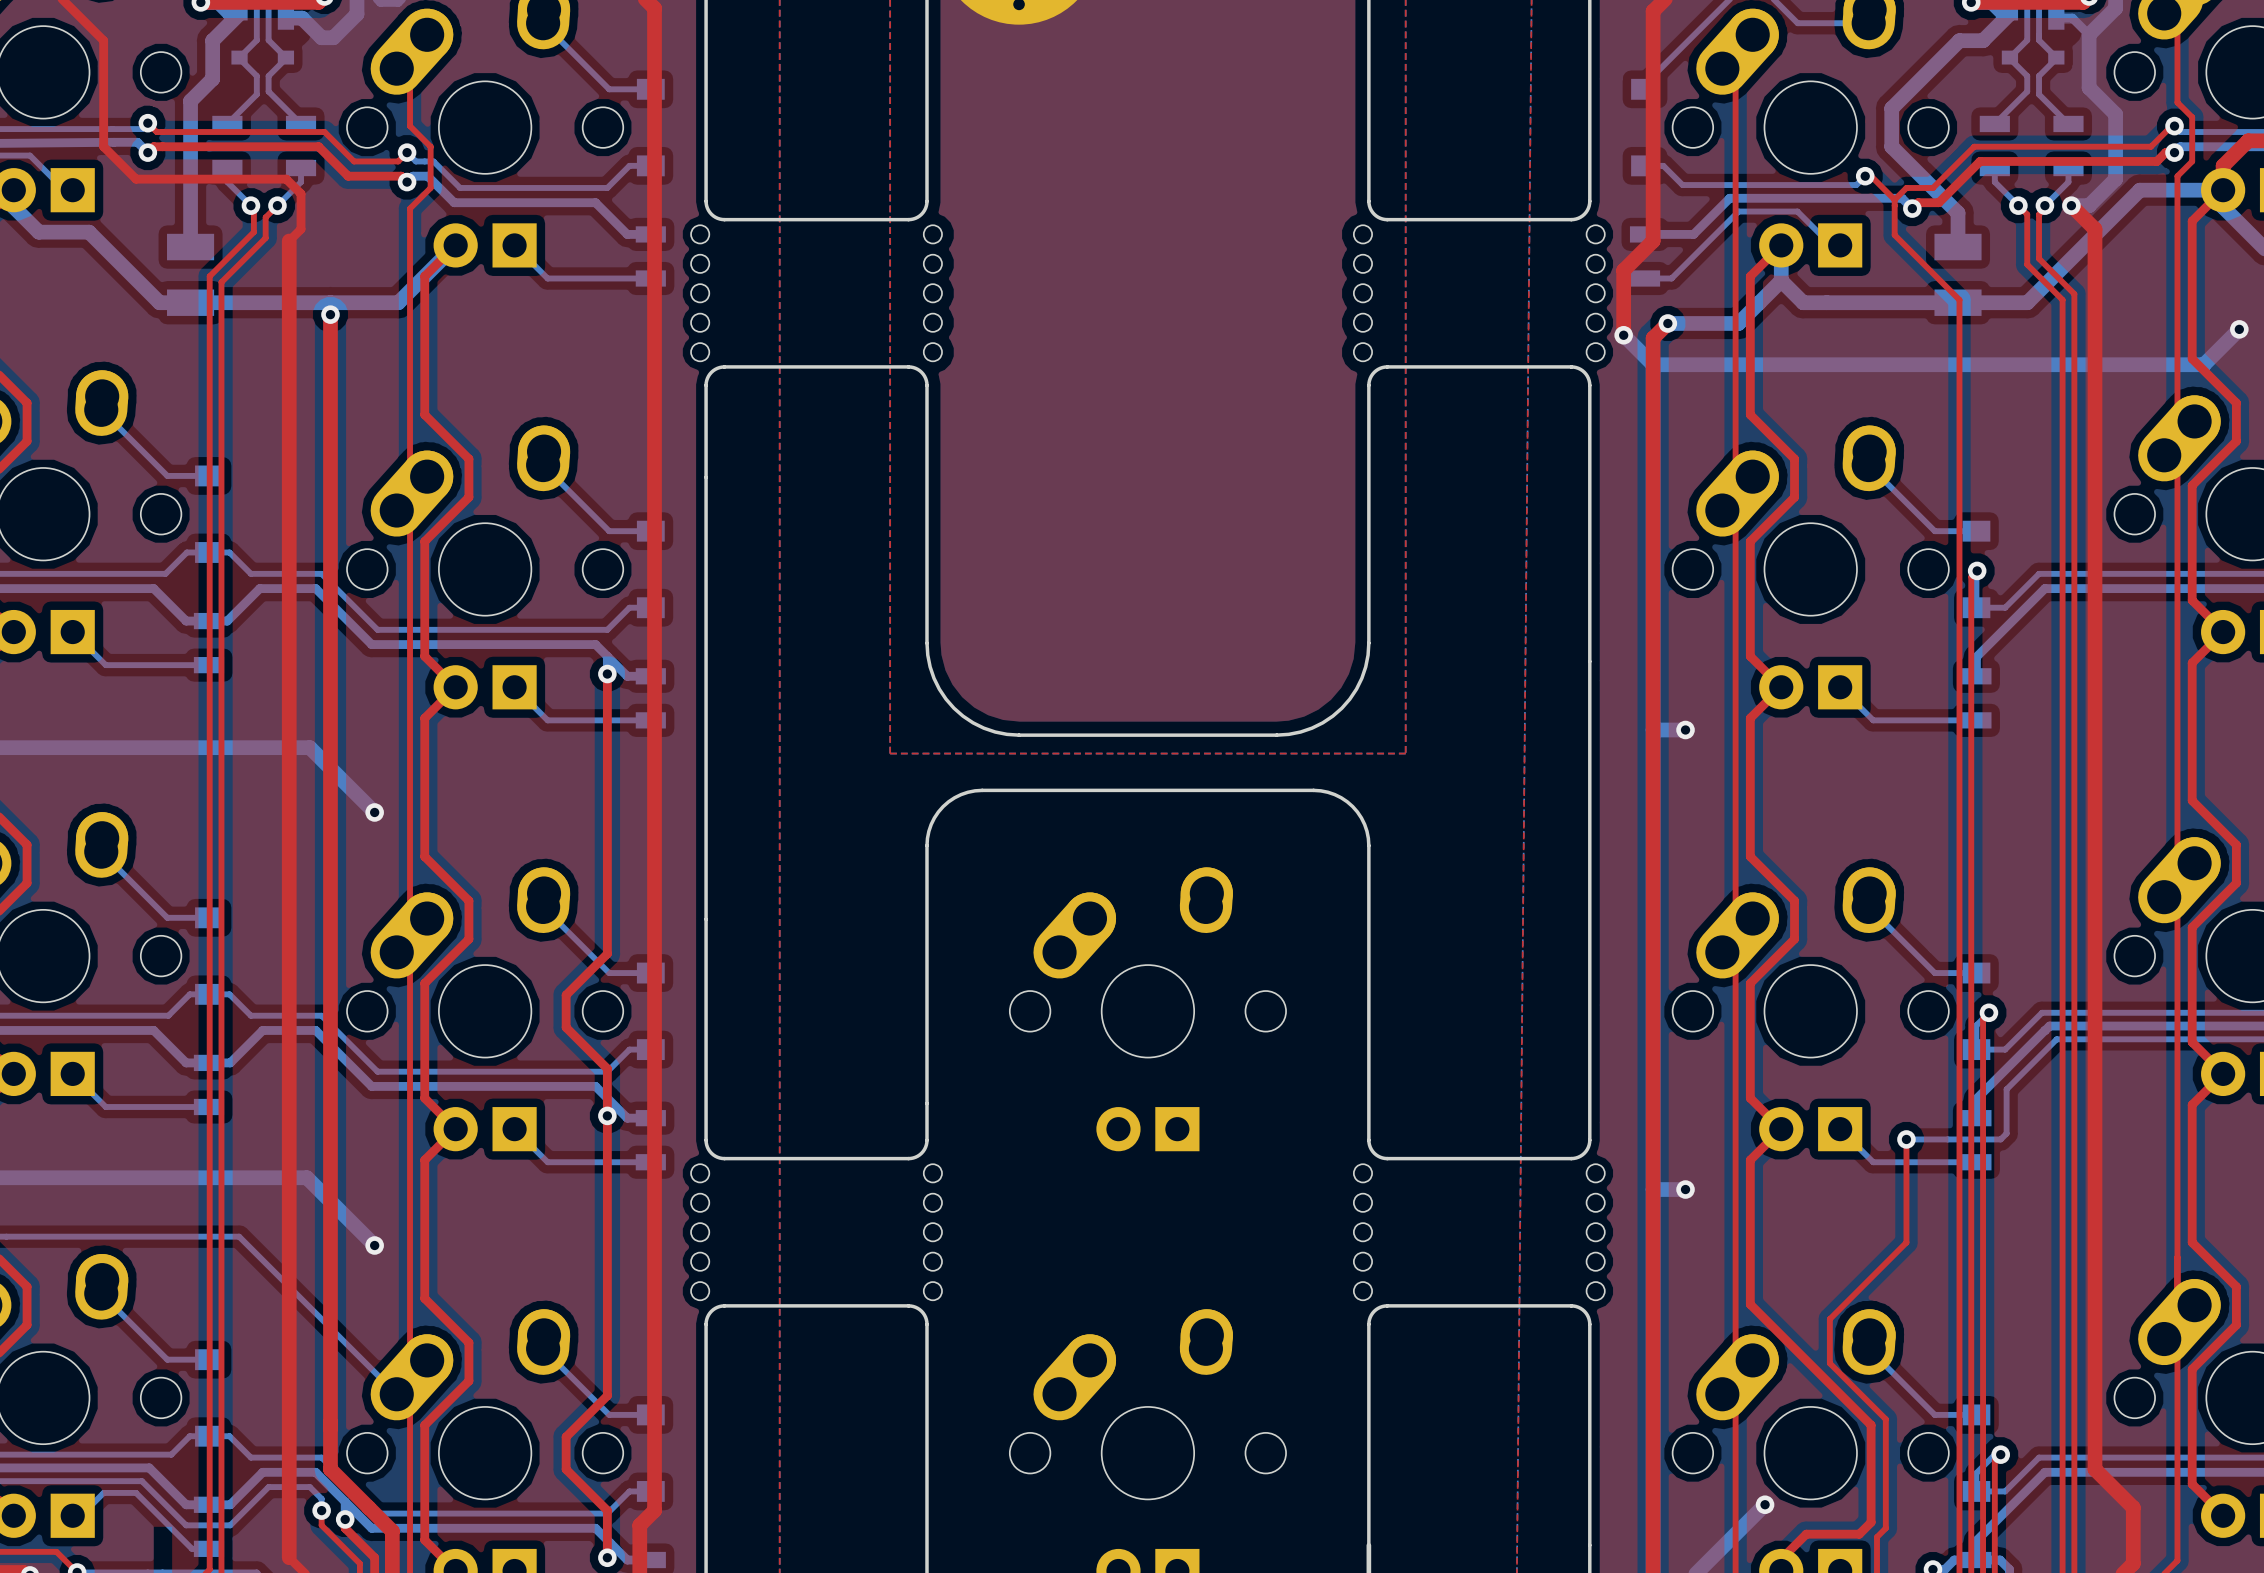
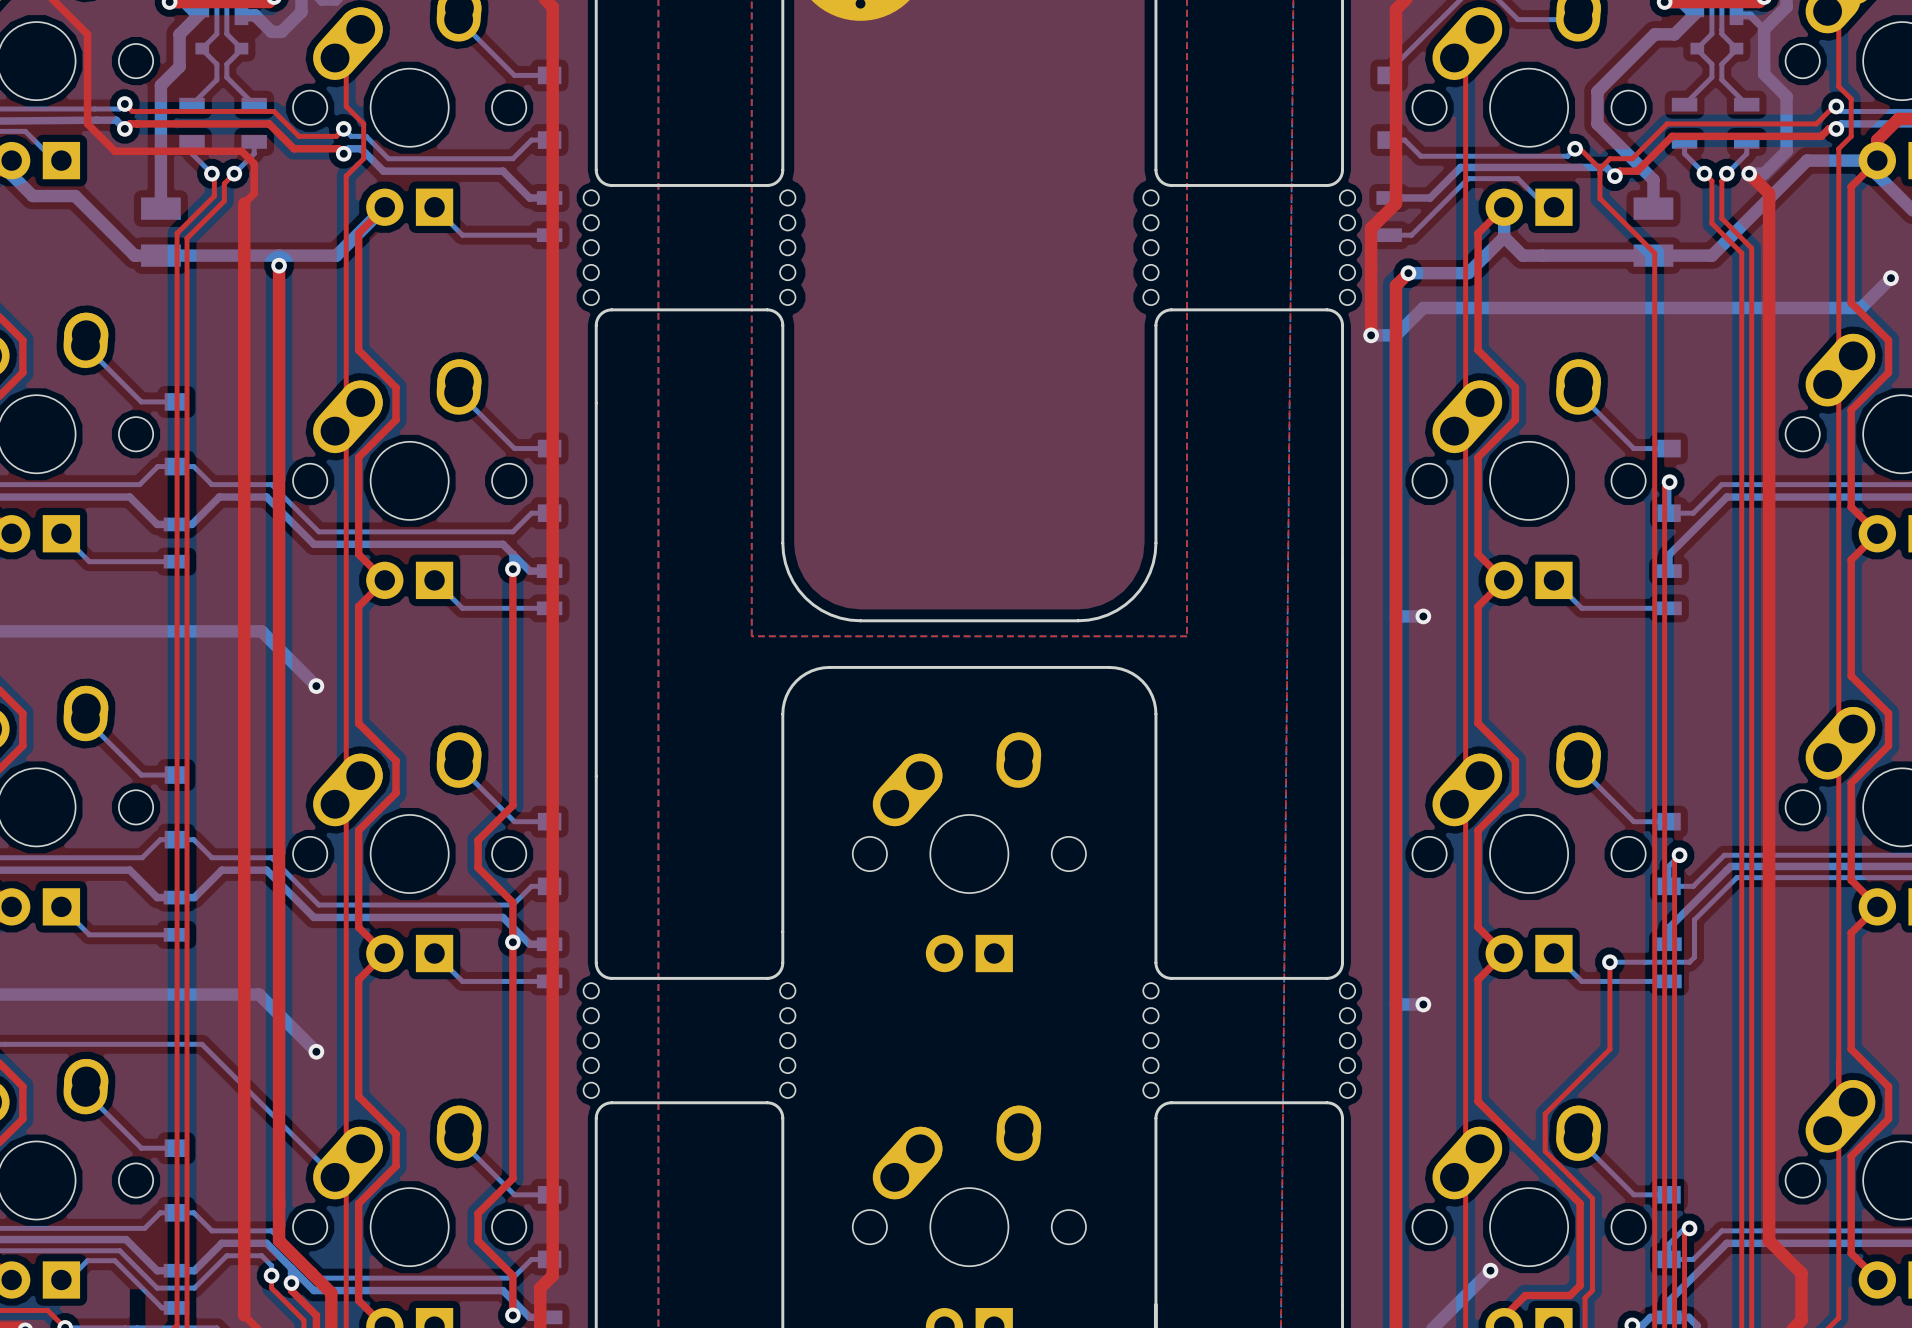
top track: none -> (1371, 283) (1371, 335)
bottom track: (1623, 335) (1653, 364) -> none
via position: (1623, 335) -> (1371, 335)
bottom track: (1653, 364) (1685, 364) -> (1371, 335) (1395, 335) (1423, 307)

